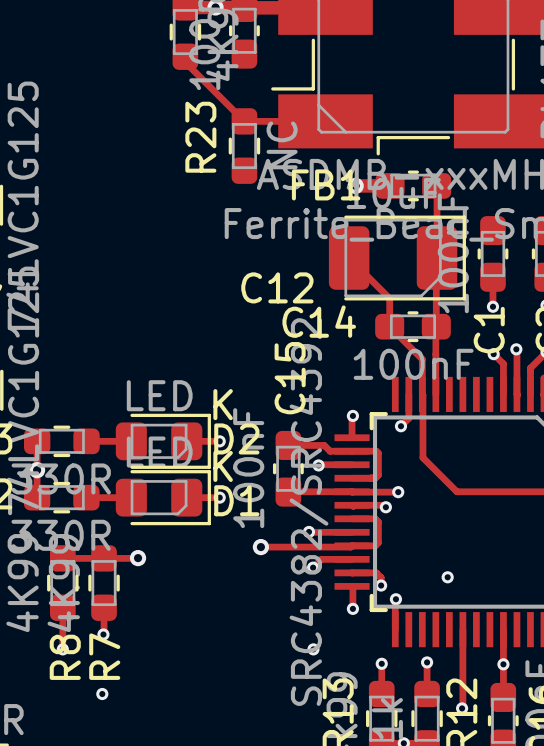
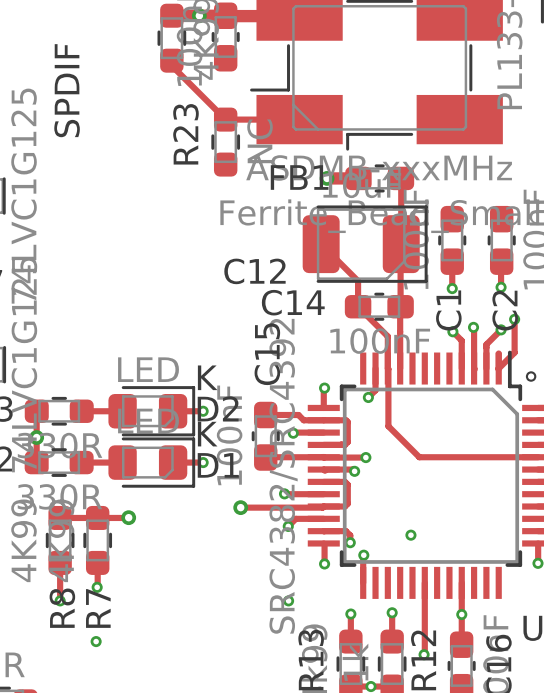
text: none -> SPDIF (67, 90)

